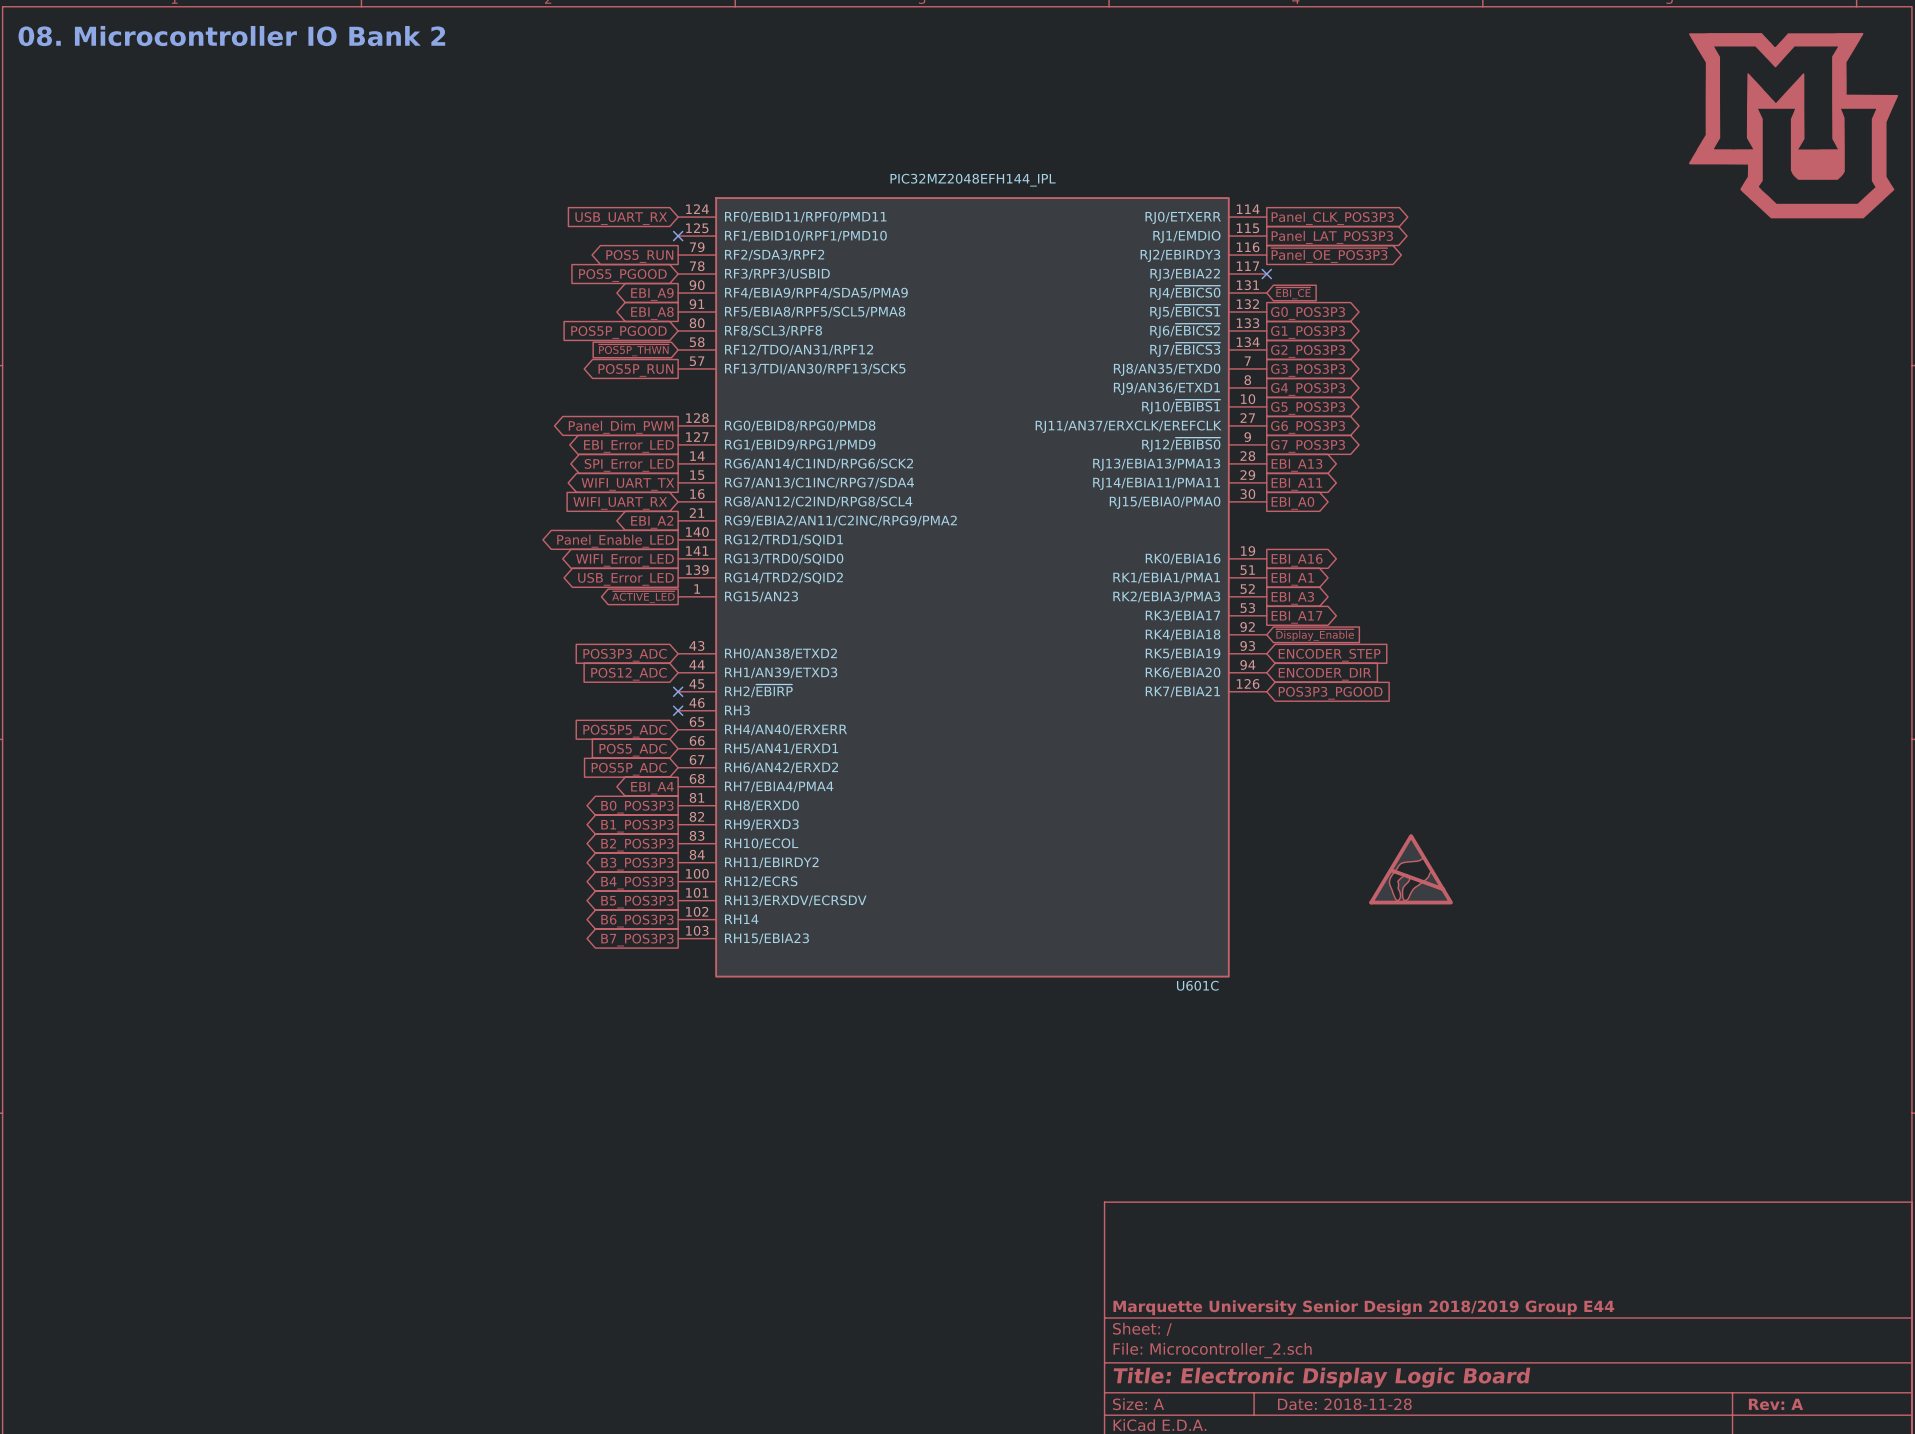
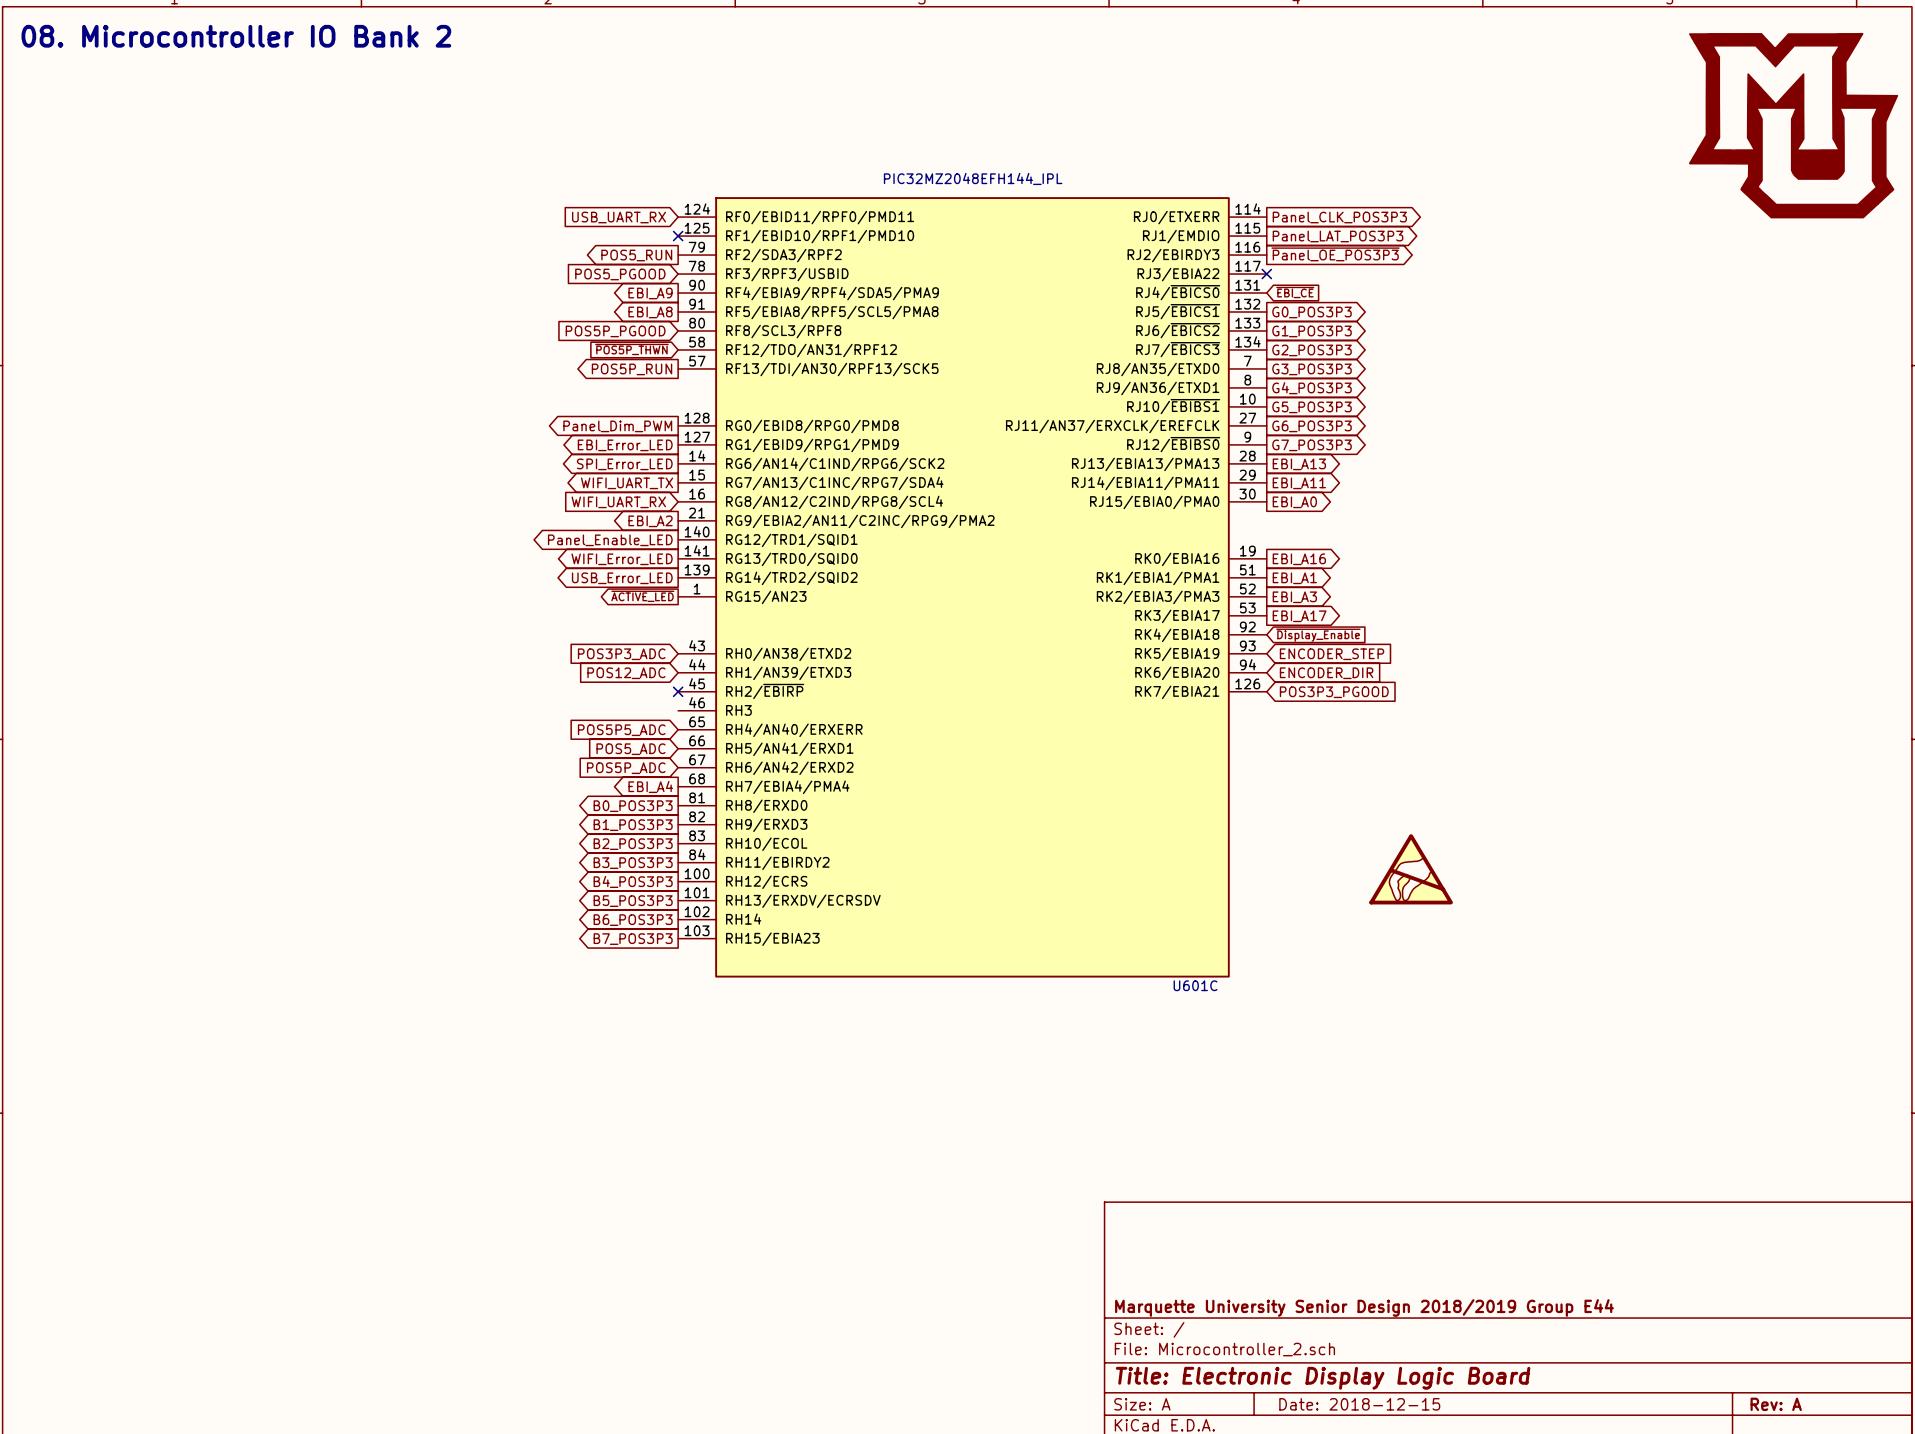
no-connect mark: (678, 710) -> none
title block: Date: 2018-11-28 (1344, 1404) -> Date: 2018-12-15 (1359, 1404)

